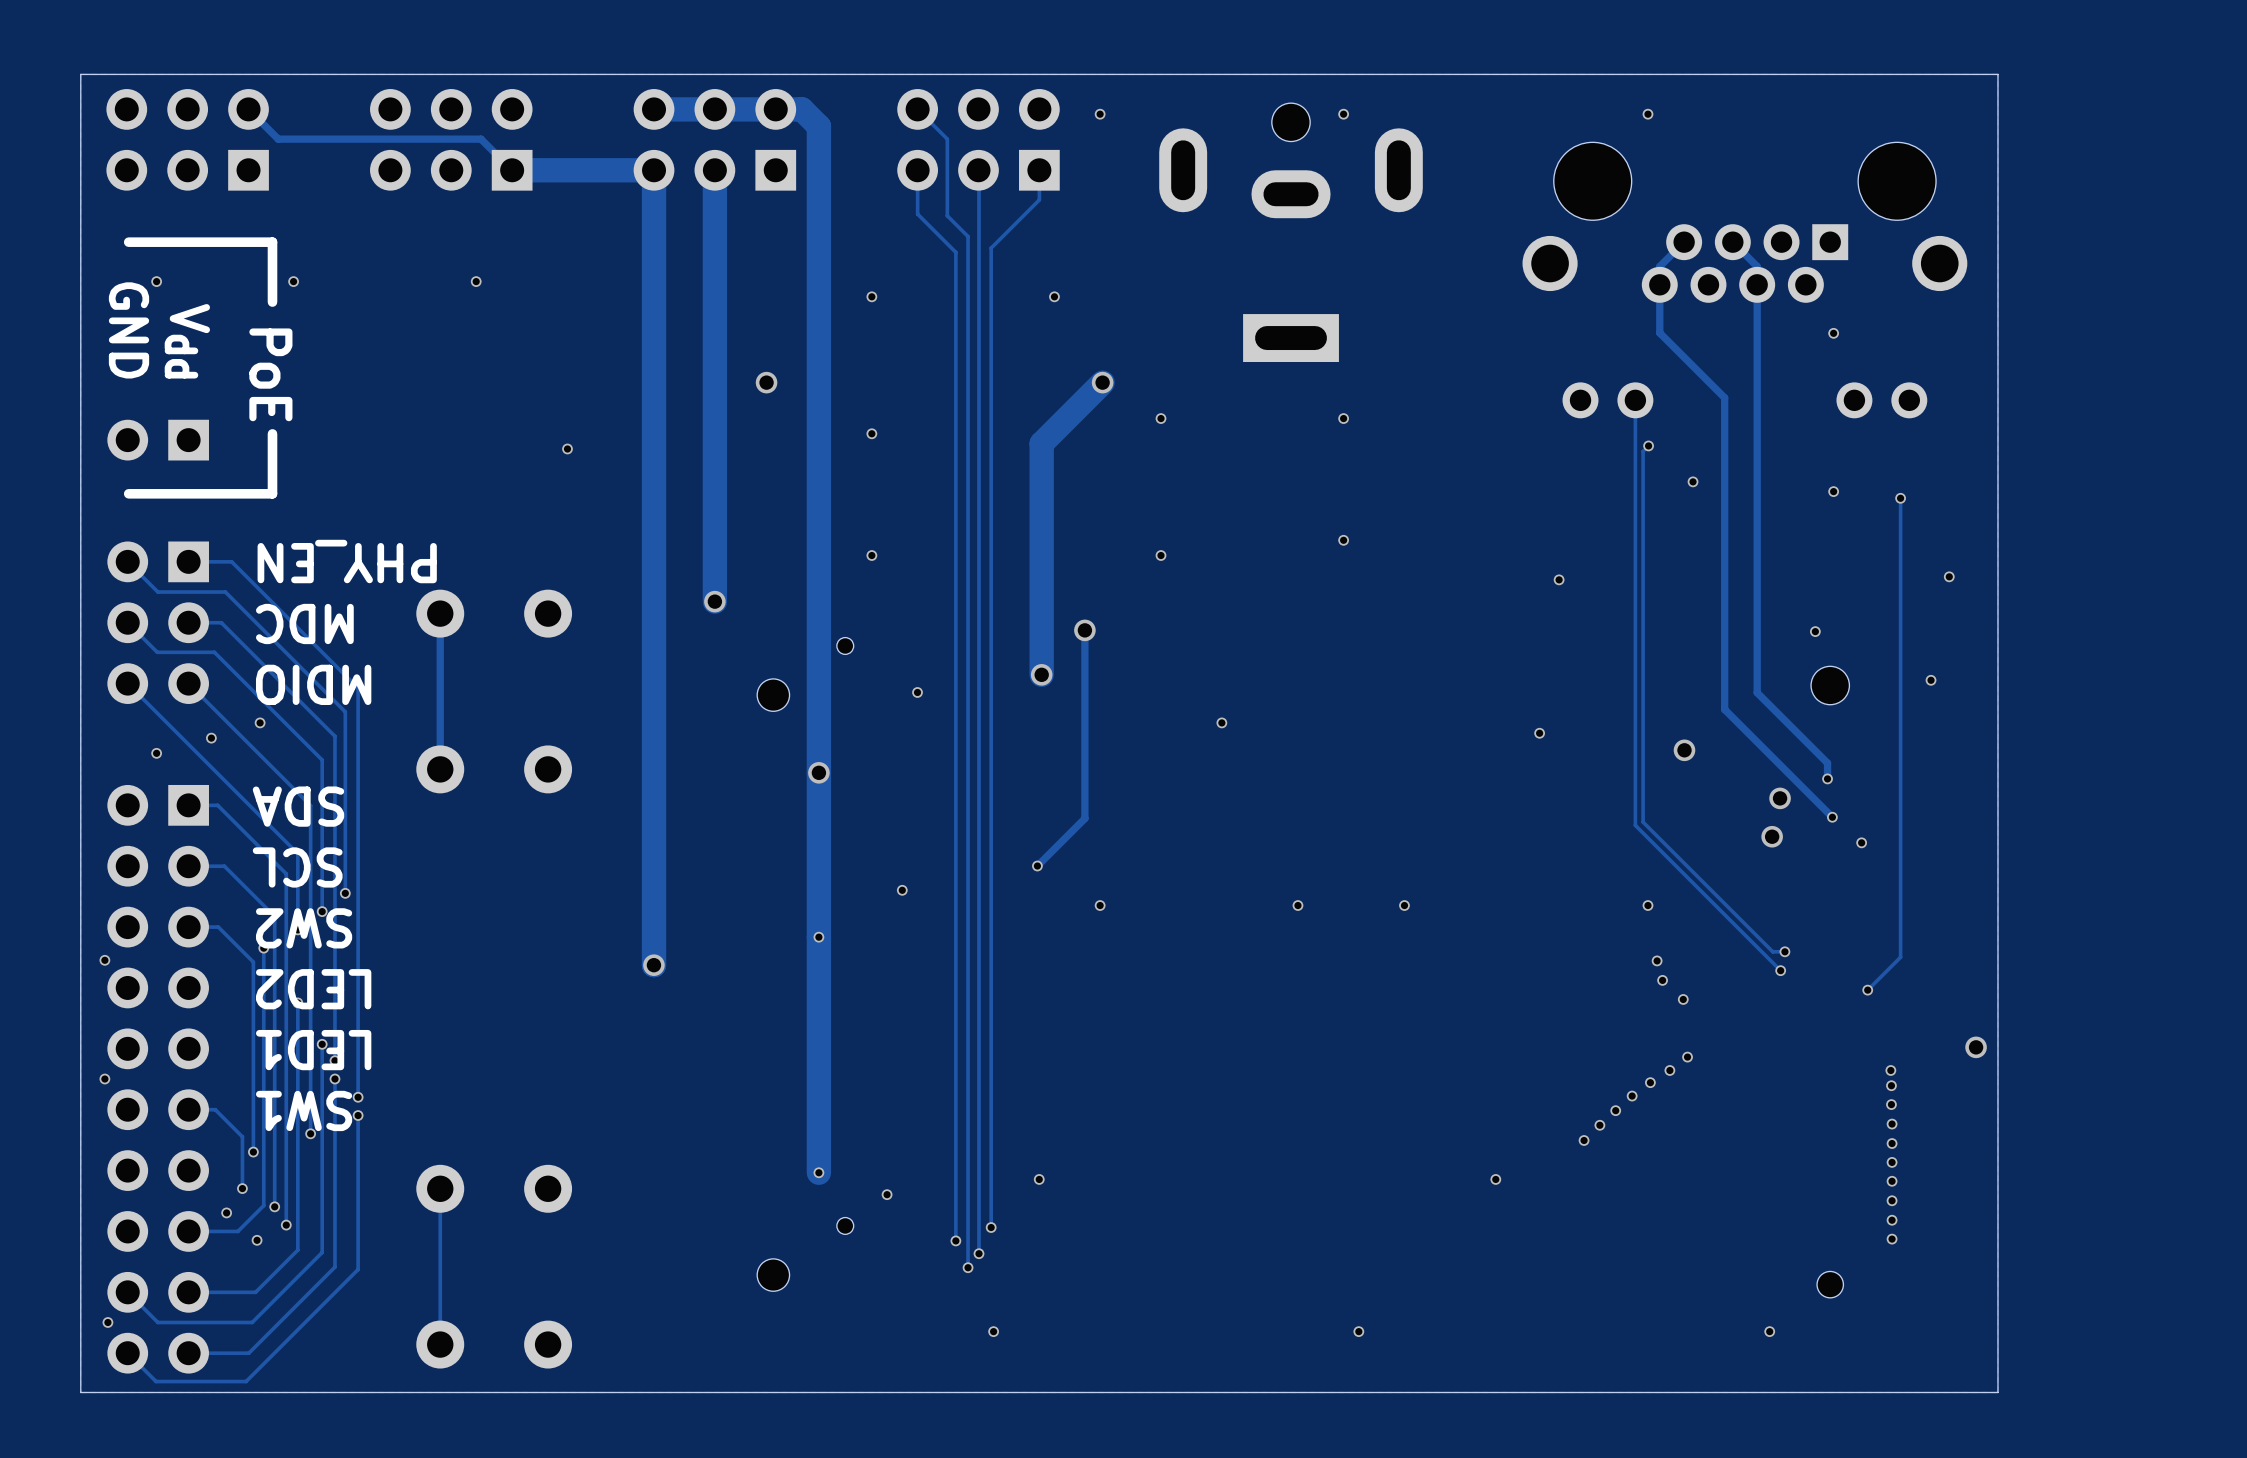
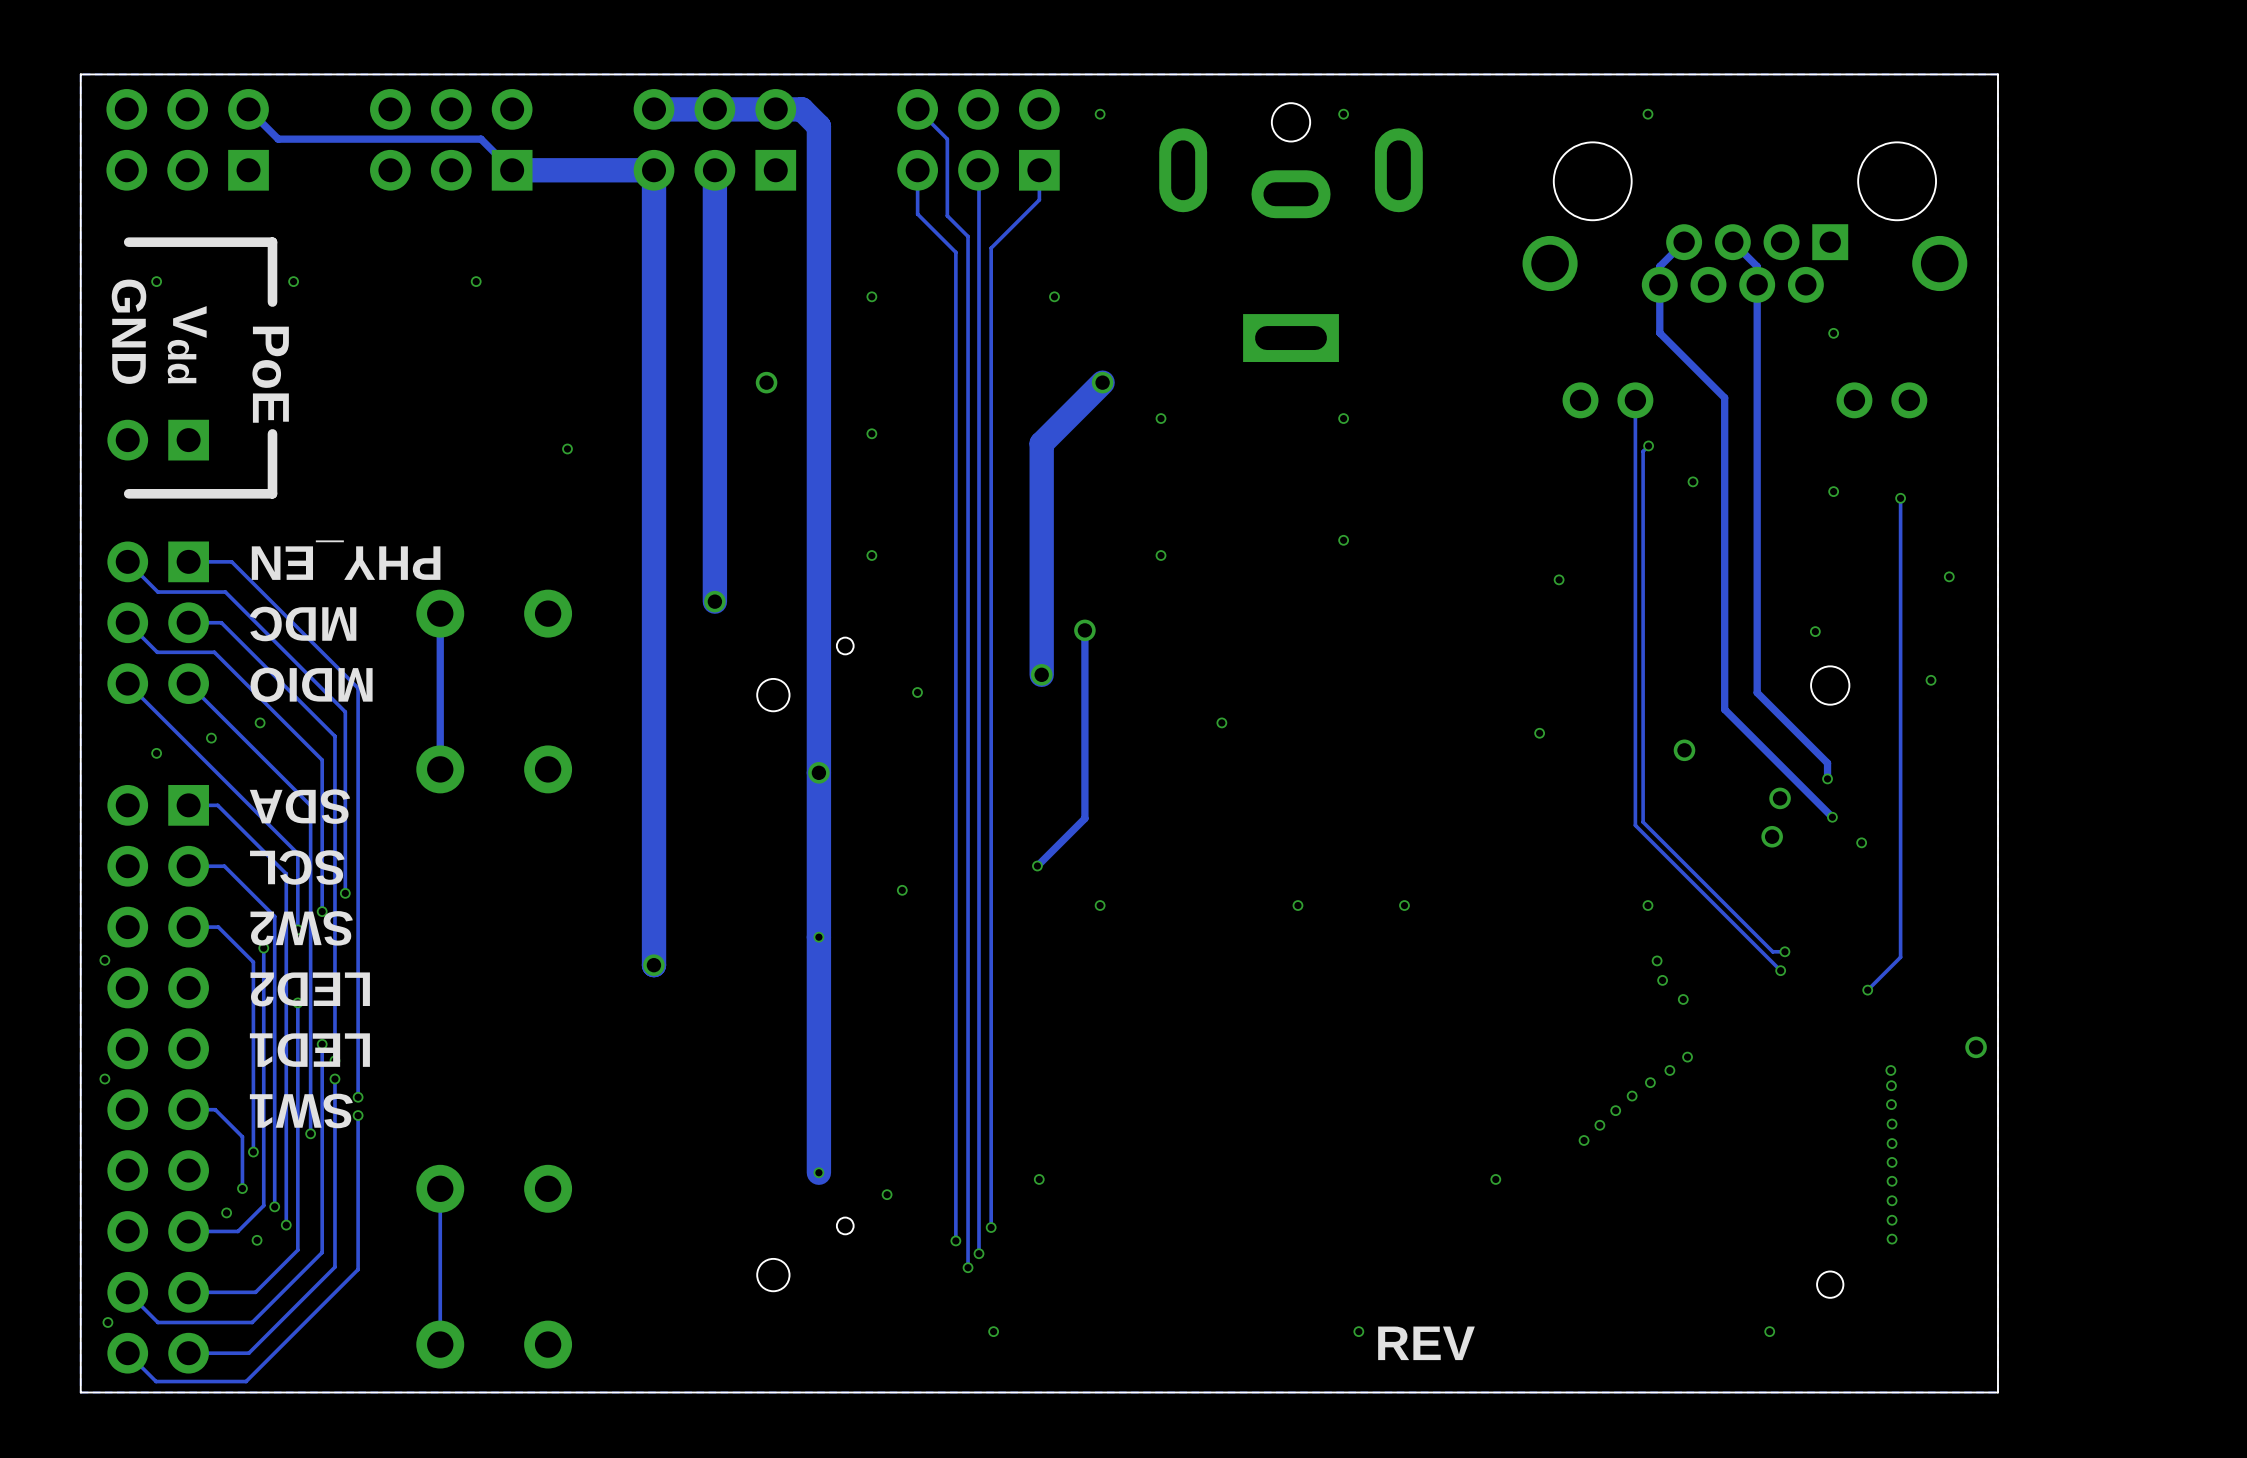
text: none -> REV (1426, 1343)

